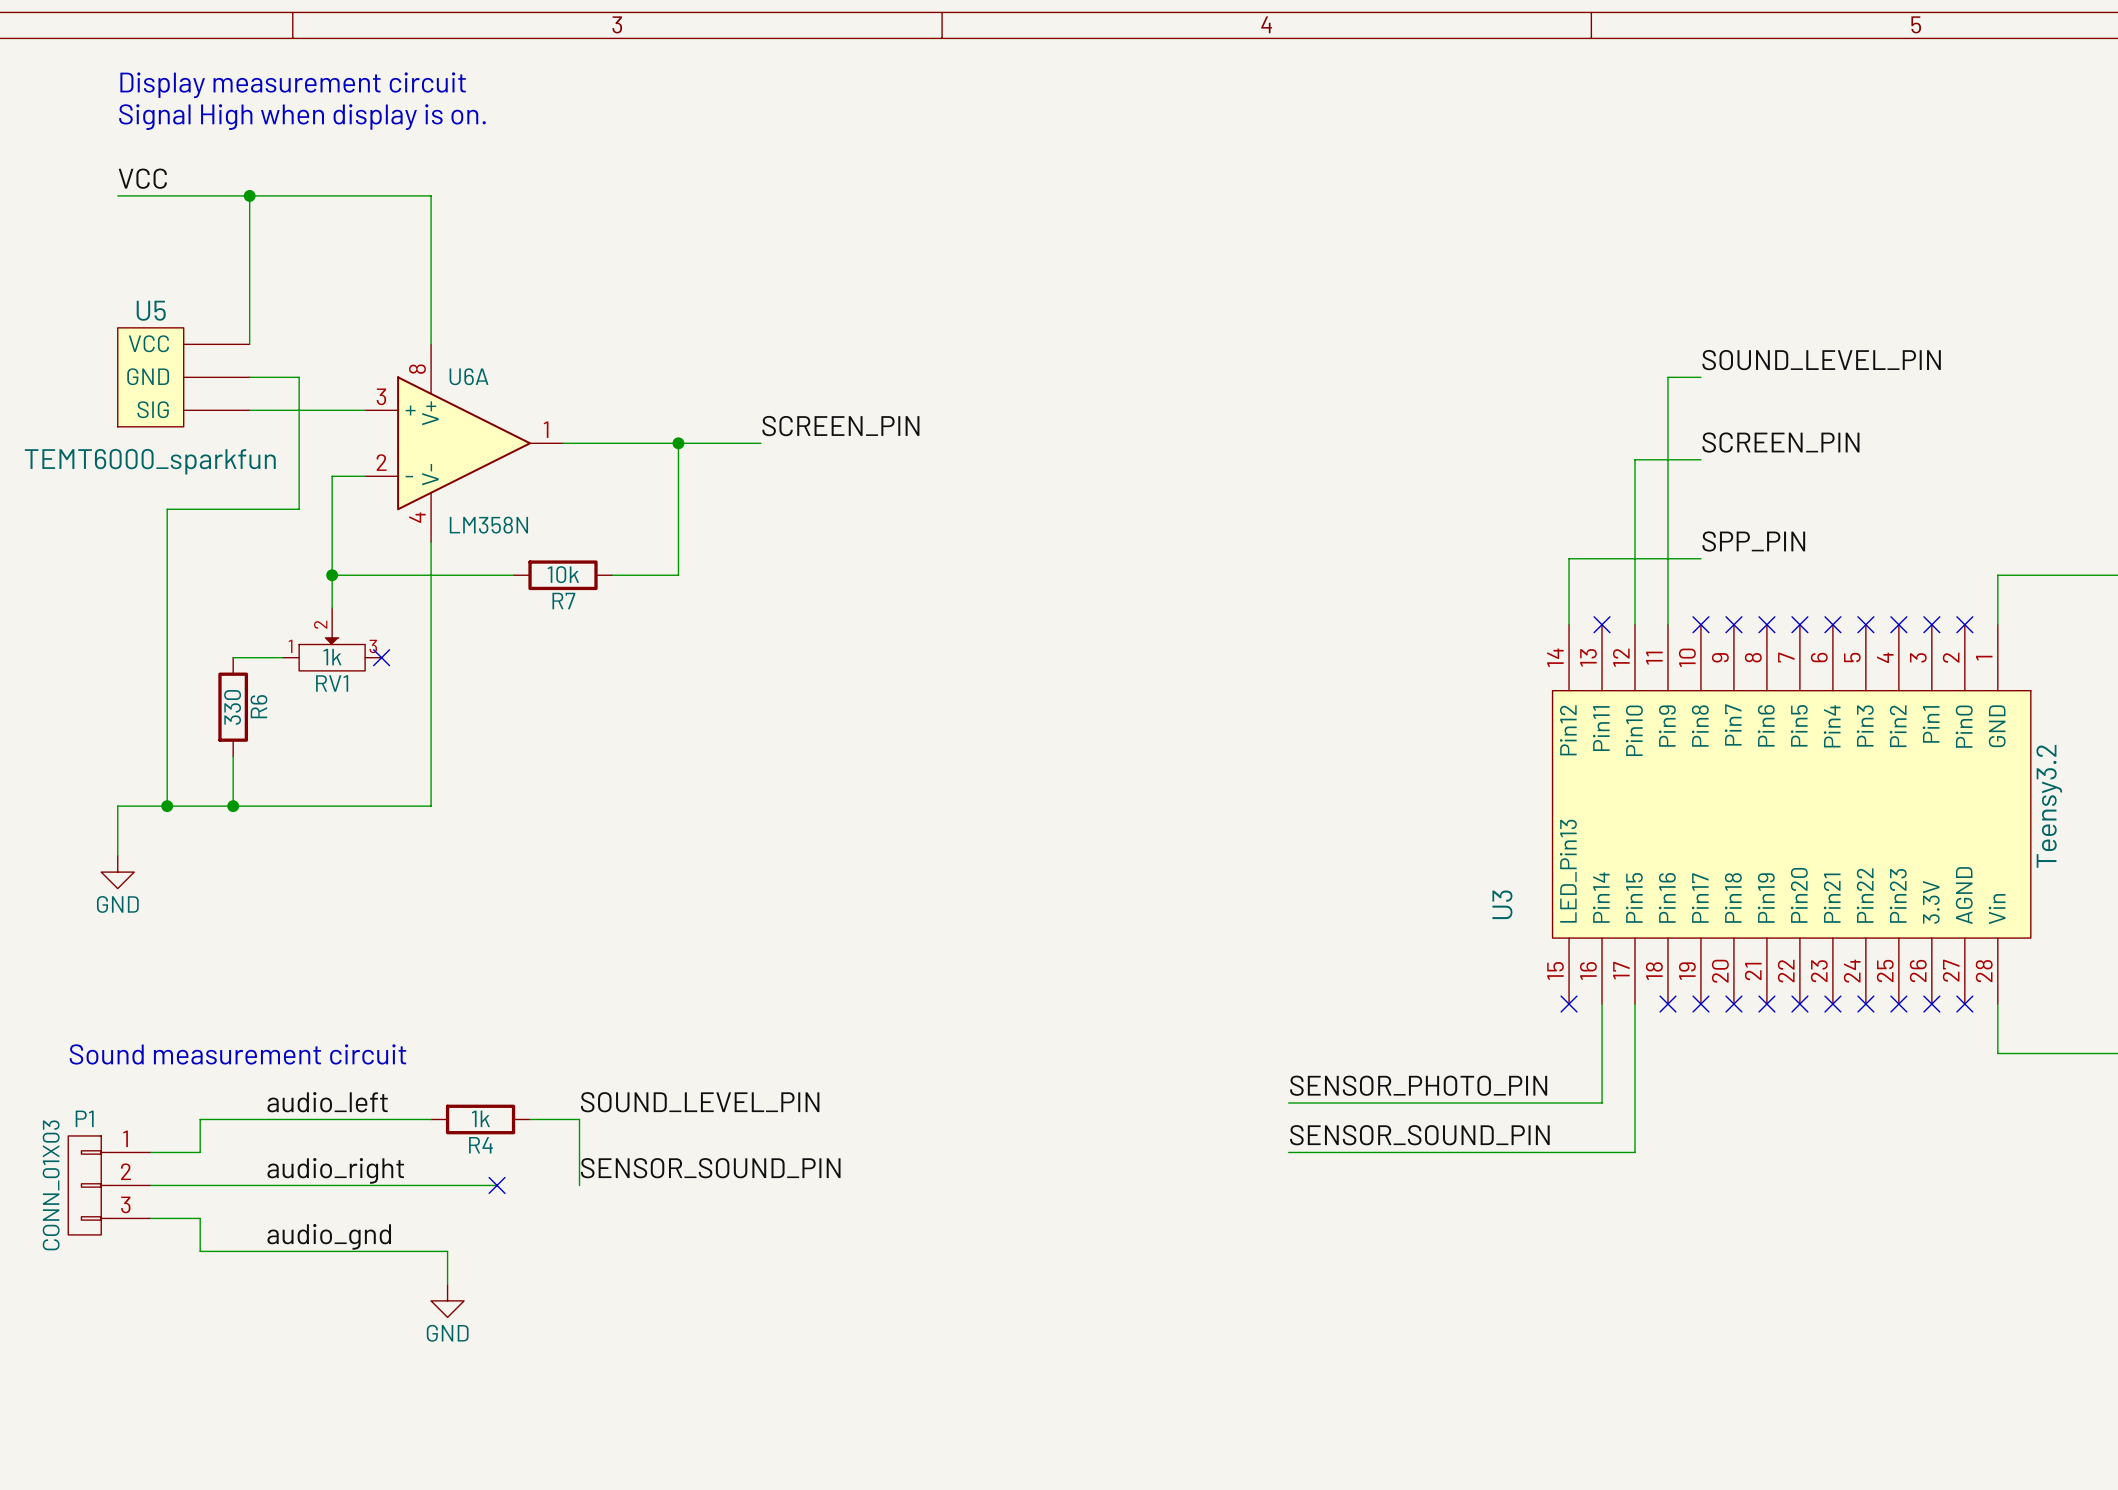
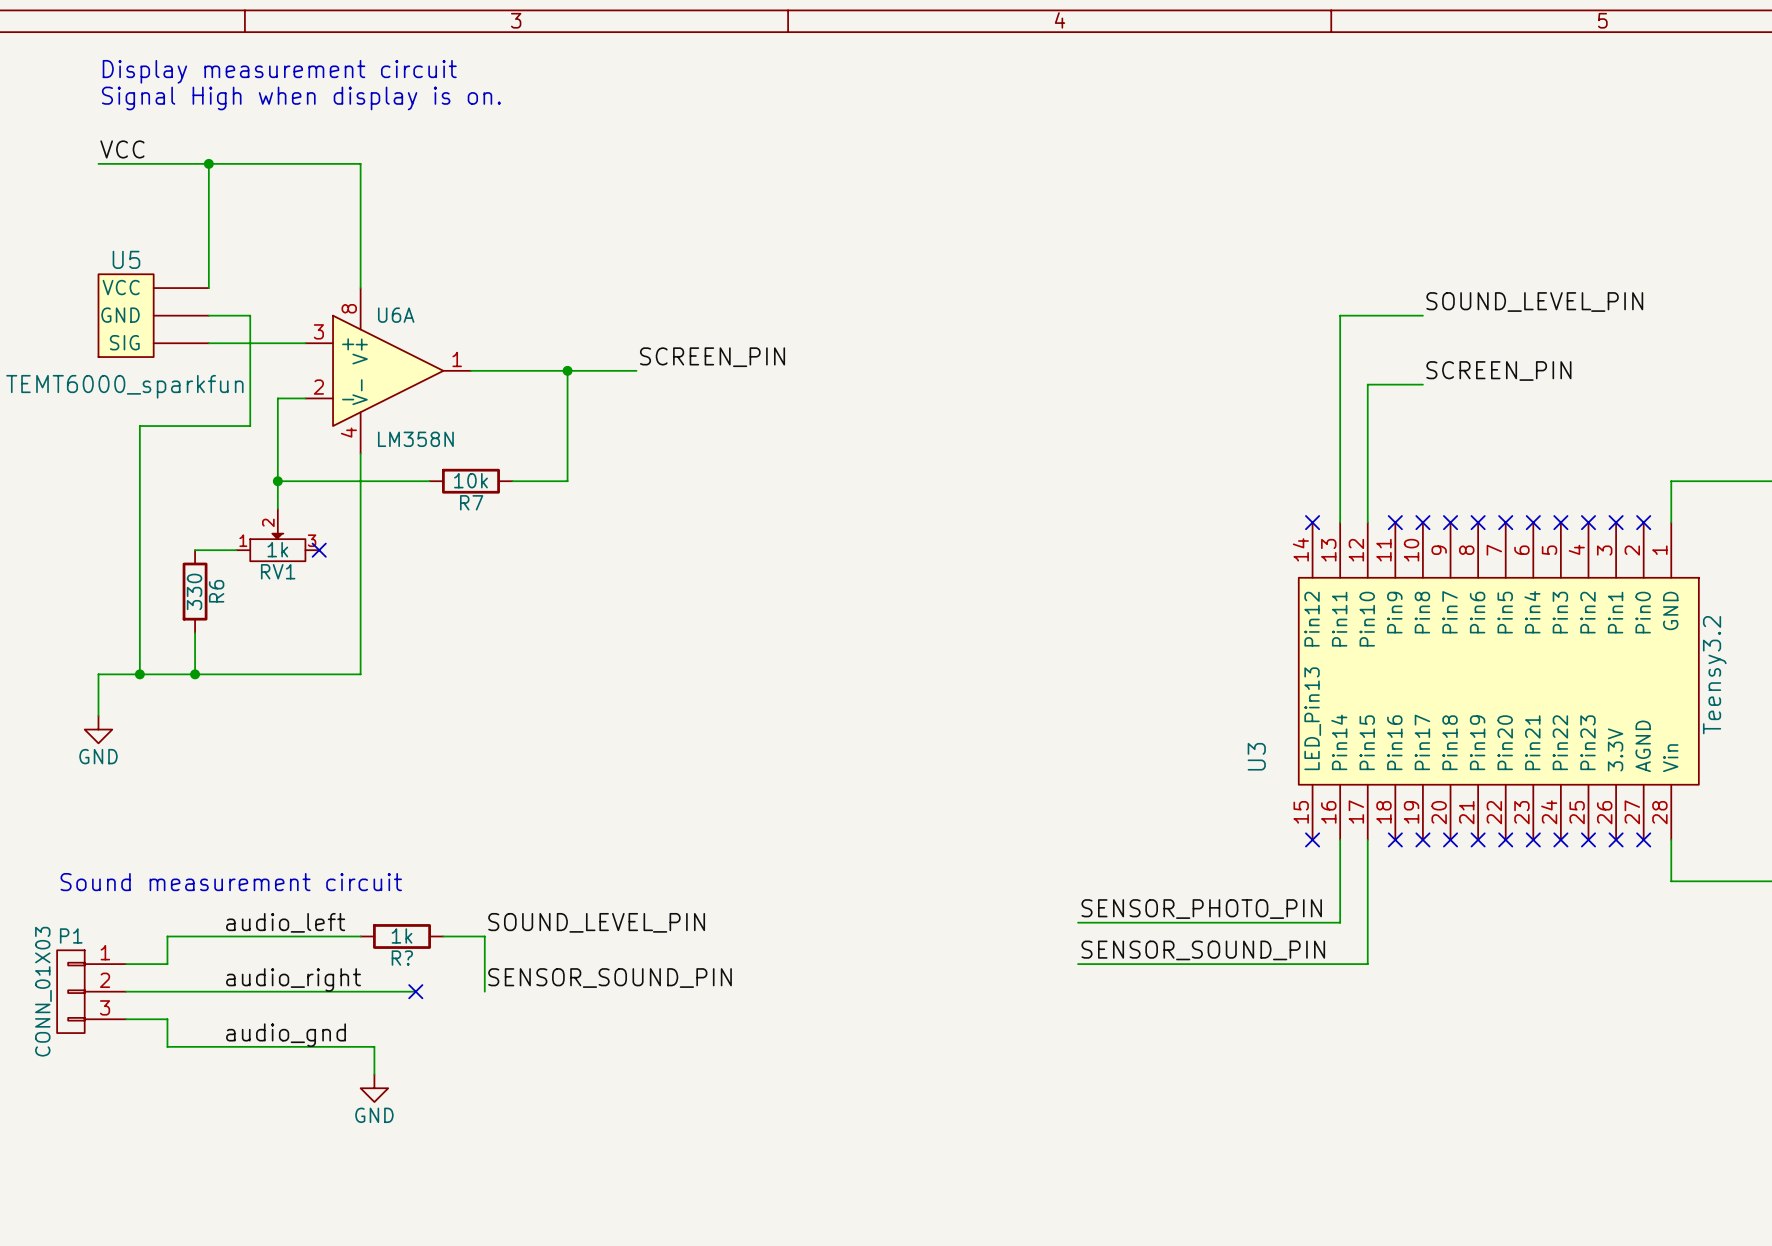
wire: (1667, 377) (1667, 624) -> (1395, 315) (1340, 315) (1340, 522)
label: SPP_PIN (1753, 541) -> none
wire: (1700, 558) (1569, 558) (1569, 624) -> none
no-connect mark: none -> (1312, 522)
no-connect mark: (1602, 624) -> none
no-connect mark: none -> (1395, 522)
R4 name: R4 (480, 1145) -> R? (402, 958)

